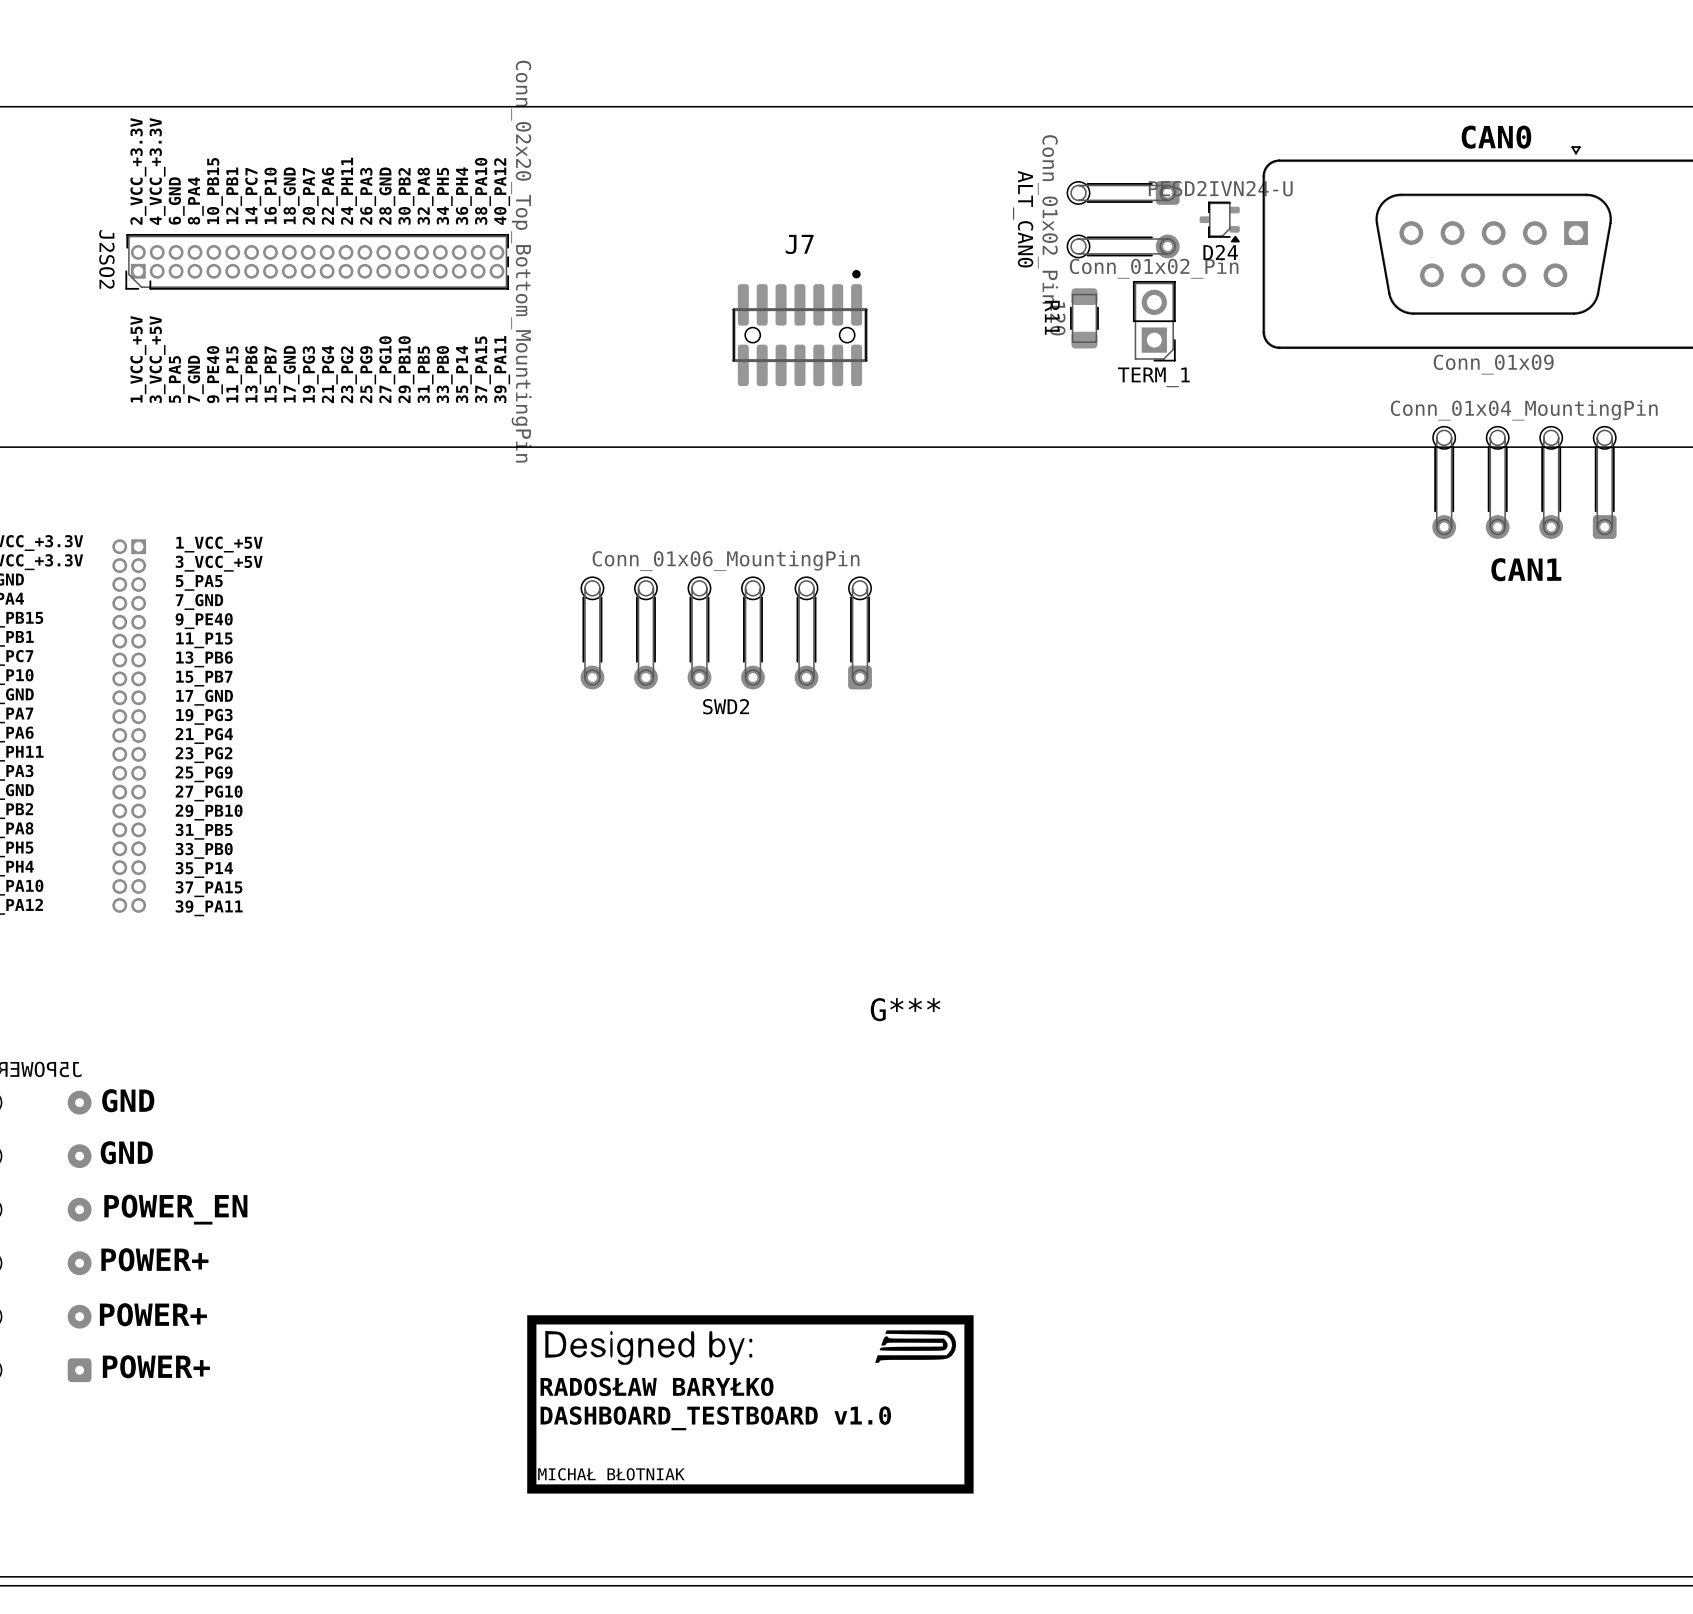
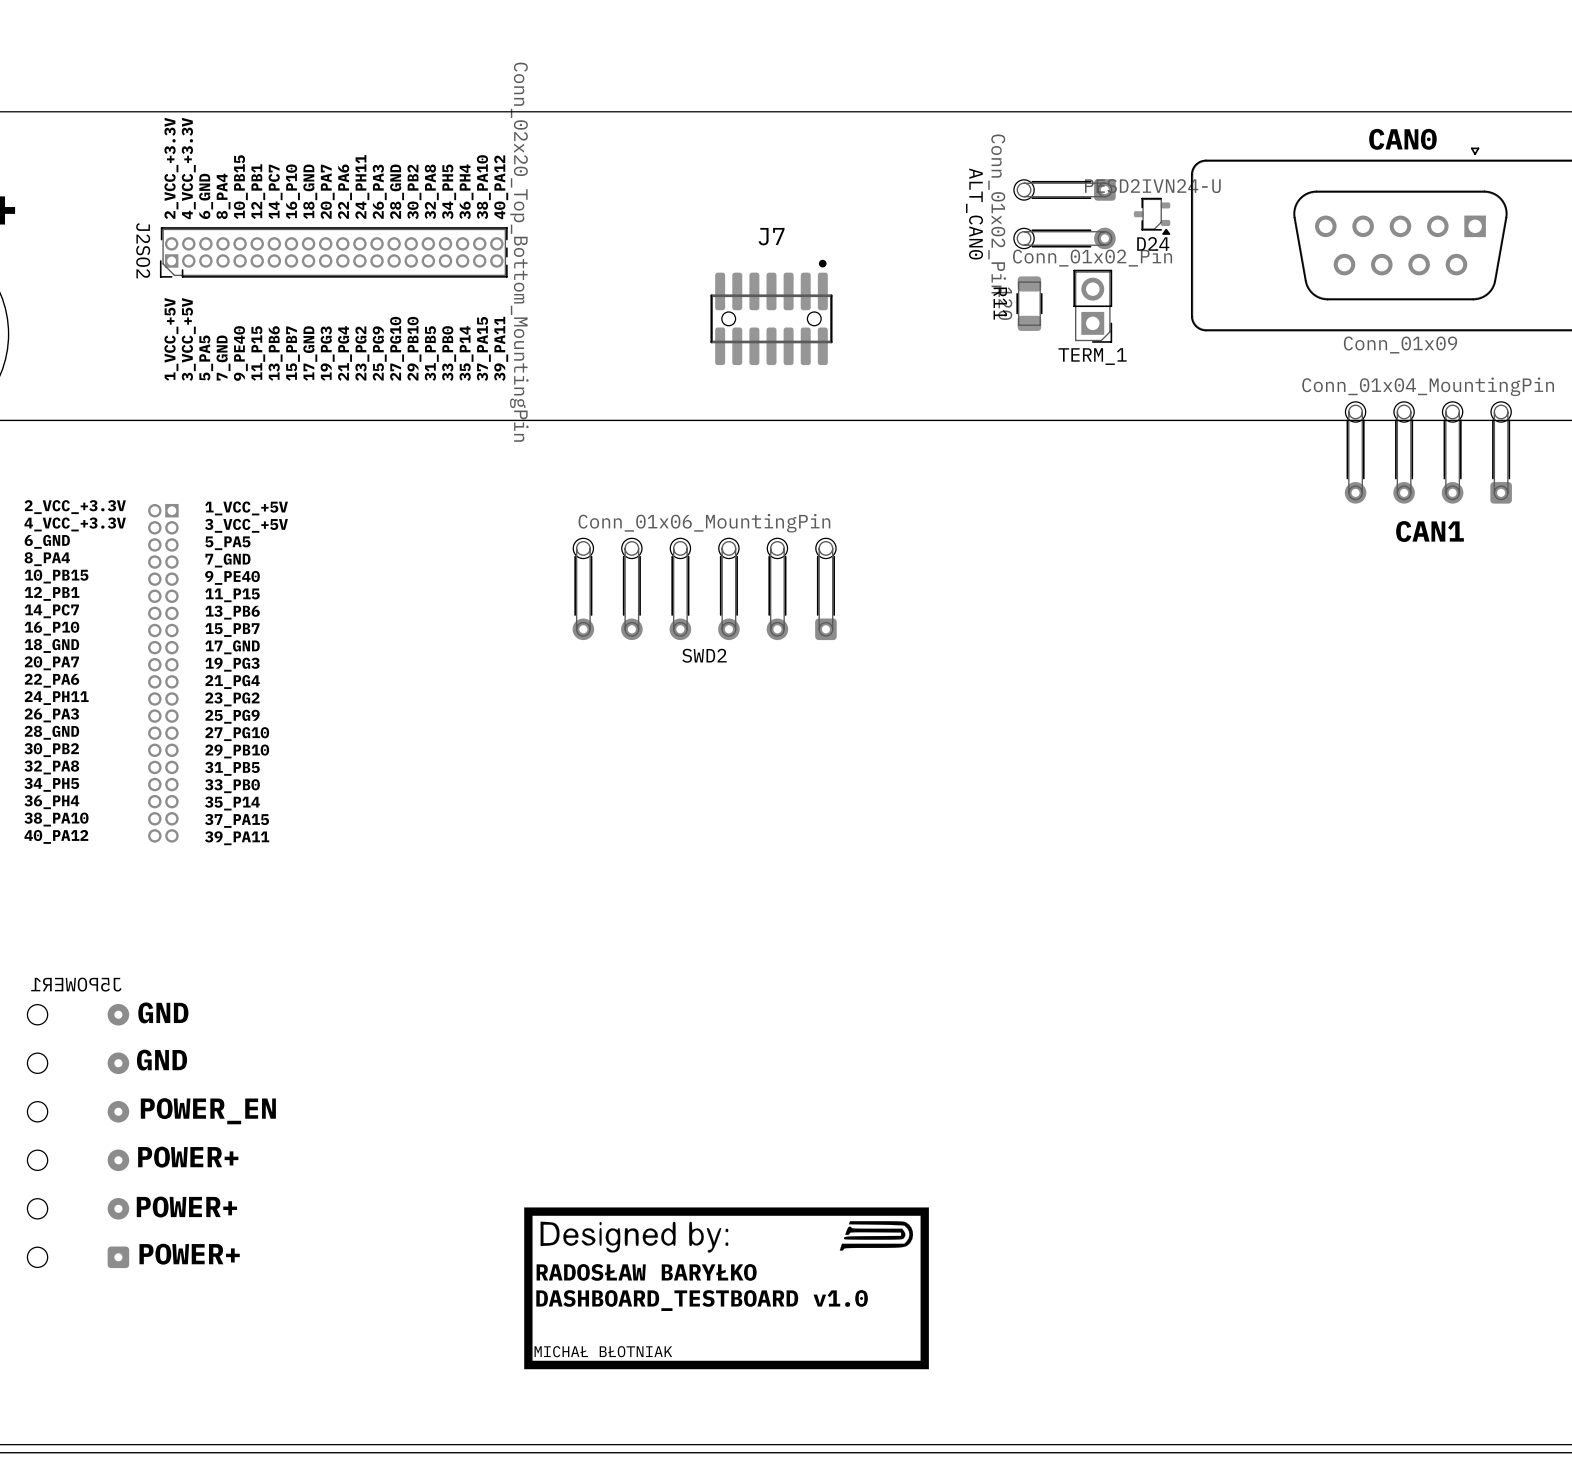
G***: (905, 1009) -> none

